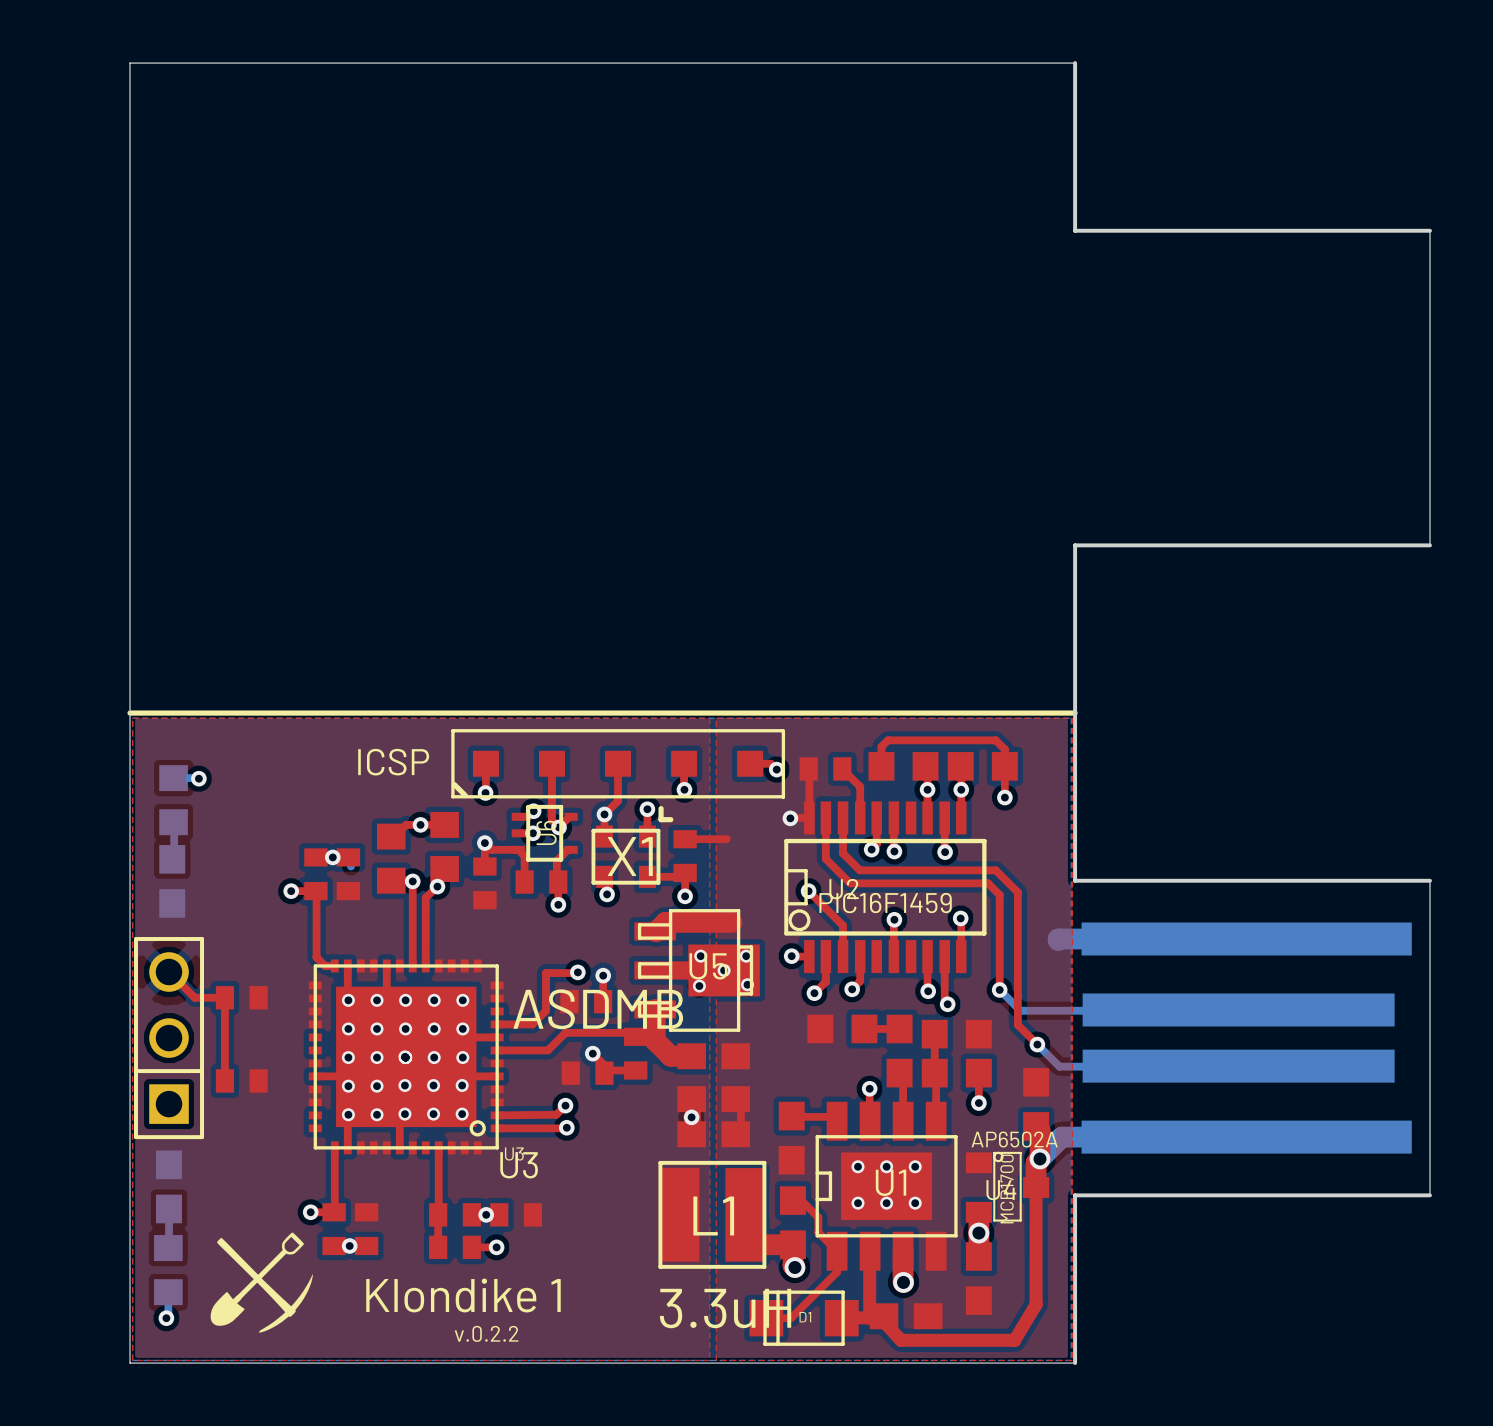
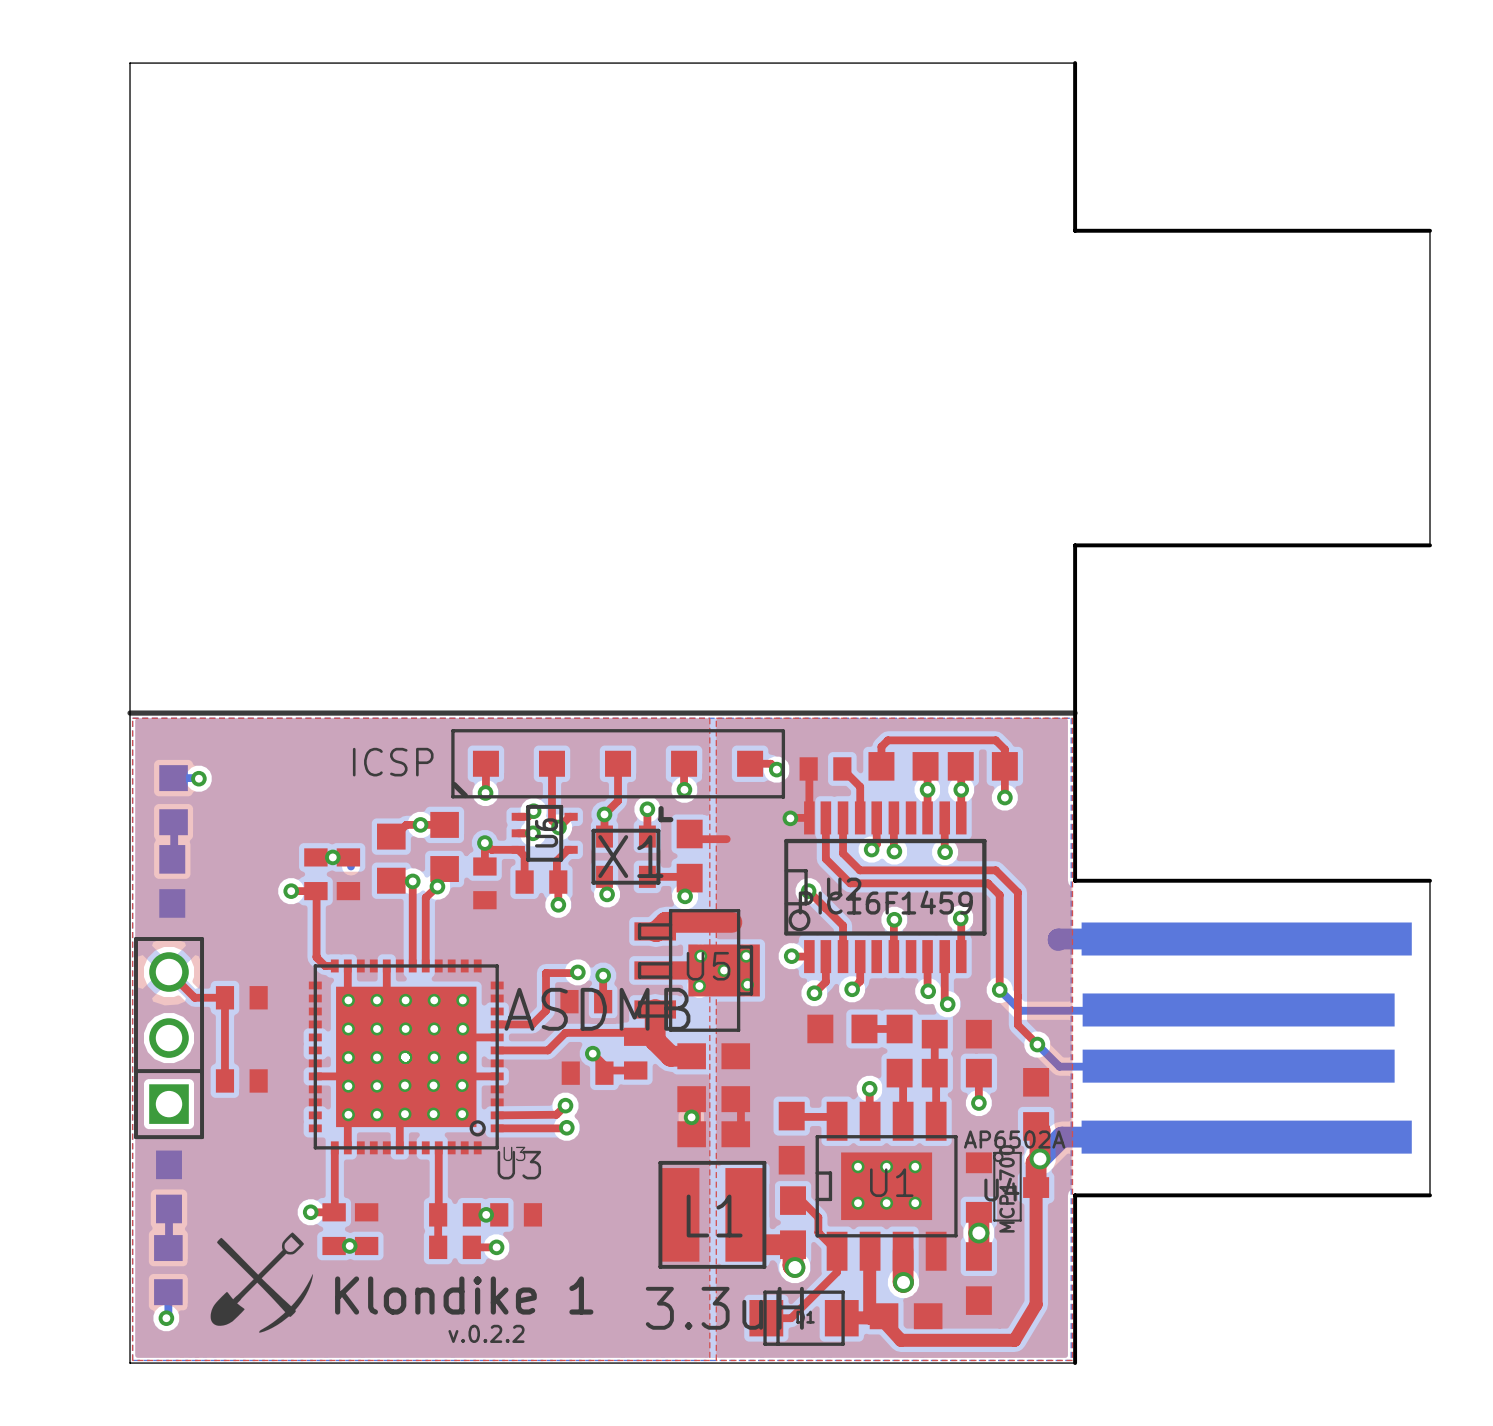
part footprint: [673, 830, 697, 882] -> [676, 819, 703, 893]

